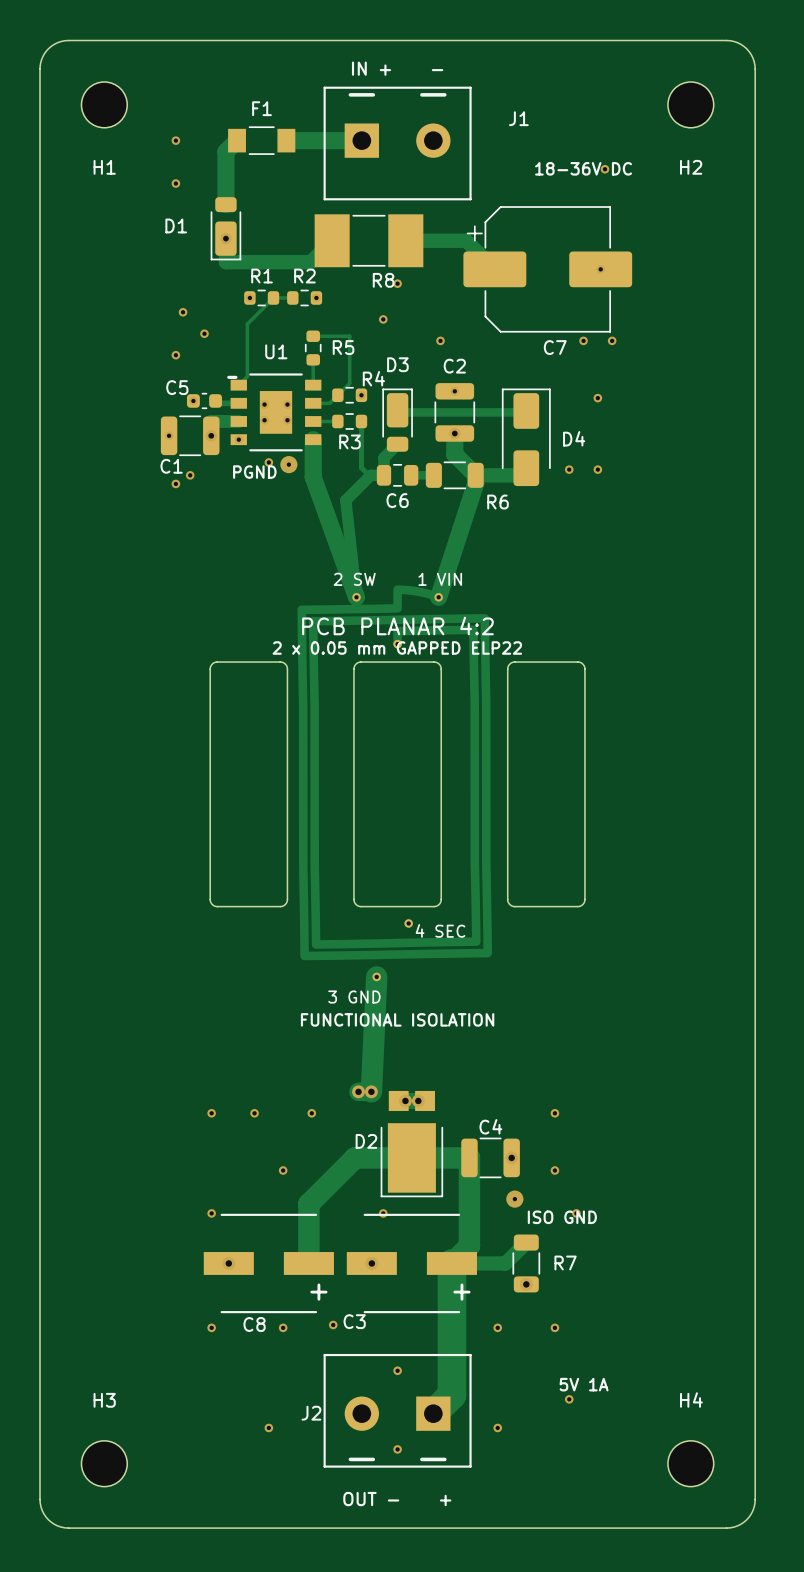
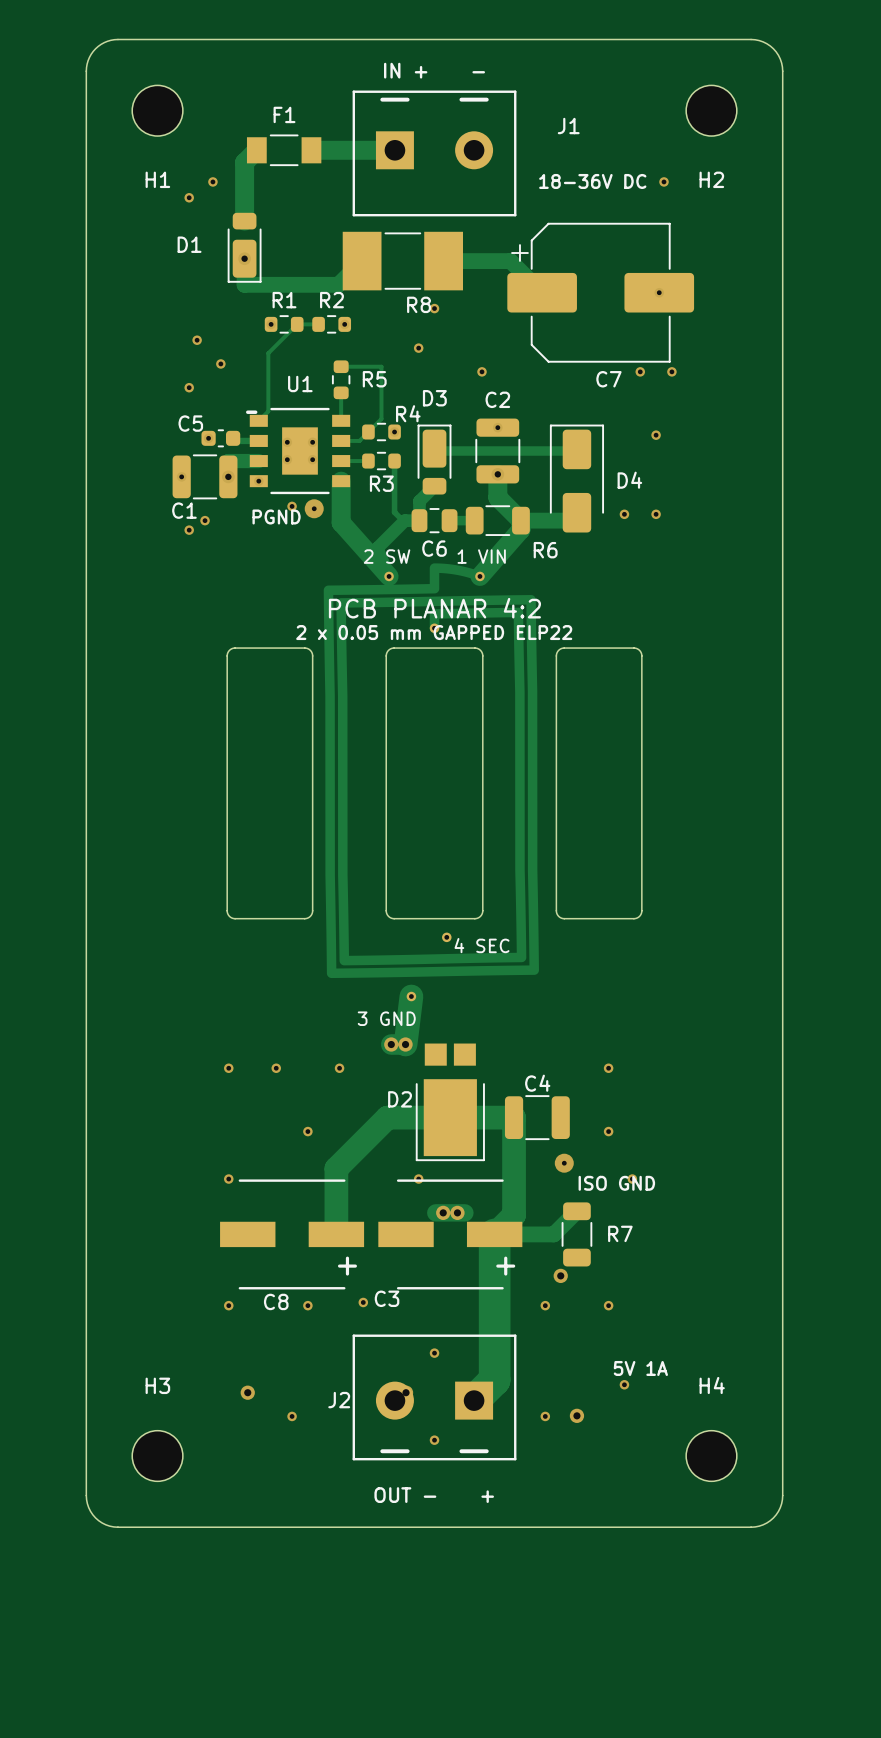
board edge: (111, 40) (59, 42) (50, 46) (44, 53) (39, 69) (39, 1499) (42, 1510) (48, 1519) (57, 1525) (68, 1528) (726, 1528) (740, 1524) (753, 1510) (755, 1499) (755, 69) (749, 51) (737, 42) (726, 40) (683, 40) -> (117, 39) (107, 41) (95, 48) (88, 60) (86, 71) (86, 1495) (88, 1507) (95, 1517) (105, 1524) (117, 1527) (751, 1527) (766, 1522) (773, 1517) (780, 1507) (782, 1495) (782, 71) (780, 59) (773, 48) (763, 41) (751, 39)
H1 position: (104, 104) -> (157, 110)
H2 position: (690, 104) -> (711, 110)
via position: (175, 140) -> (212, 181)
text position: 18-36V DC (583, 168) -> 18-36V DC (592, 181)
track: (313, 477) (356, 597) (345, 500) -> (341, 522) (389, 576) (377, 548)
track: (475, 483) (438, 597) -> (520, 529) (479, 576)
text position: PCB PLANAR 4:2 (397, 626) -> PCB PLANAR 4:2 (434, 608)
text position: 2 x 0.05 mm GAPPED ELP22 (397, 647) -> 2 x 0.05 mm GAPPED ELP22 (434, 632)
board edge: (210, 669) (212, 664) (217, 662) (281, 662) (285, 664) (287, 669) -> (227, 735) (227, 655) (229, 650) (235, 648) (304, 648) (310, 650) (312, 655) (312, 735)
board edge: (353, 669) (356, 664) (361, 662) (434, 662) (439, 664) (441, 669) -> (386, 735) (386, 655) (388, 650) (394, 648) (474, 648) (480, 650) (482, 655) (482, 735)
board edge: (507, 669) (509, 664) (514, 662) (578, 662) (583, 664) (584, 669) -> (556, 735) (556, 655) (558, 650) (564, 648) (633, 648) (639, 650) (641, 655) (641, 735)
part position: (394, 783) -> (431, 782)
board edge: (210, 827) (210, 900) (212, 904) (217, 906) (280, 906) (285, 904) (287, 899) (287, 827) -> (227, 910) (229, 916) (235, 918) (305, 918) (310, 916) (312, 910)
board edge: (353, 827) (354, 900) (356, 905) (361, 906) (434, 906) (439, 904) (441, 899) (441, 827) -> (386, 910) (388, 916) (394, 918) (475, 918) (480, 916) (482, 910)
board edge: (507, 827) (507, 900) (509, 904) (514, 906) (577, 906) (582, 904) (584, 899) (584, 827) -> (556, 910) (558, 916) (564, 918) (634, 918) (639, 916) (641, 910)
track: none -> (411, 996) (405, 1044) (391, 1044)
via: none -> (391, 1044)
via: none -> (405, 1044)
via: none -> (228, 1068)
via: none -> (276, 1068)
via: none -> (339, 1068)
via: none -> (608, 1068)
track: (376, 976) (371, 1091) (358, 1091) -> none
text: FUNCTIONAL ISOLATION (397, 1019) -> none
via: none -> (307, 1131)
via: none -> (608, 1131)
via: none -> (564, 1163)
via: none -> (228, 1179)
via: none -> (418, 1179)
via: none -> (632, 1179)
via: (358, 1091) -> none
via: (371, 1091) -> none
via: (211, 1113) -> none
via: (254, 1113) -> none
via: (311, 1113) -> none
via: (554, 1113) -> none
D2 position: (411, 1144) -> (450, 1102)
C4 position: (490, 1157) -> (537, 1117)
via position: (283, 1170) -> (307, 1305)
via position: (554, 1170) -> (608, 1305)
via: none -> (363, 1302)
via: none -> (545, 1305)
via: (514, 1199) -> none
via position: (211, 1213) -> (228, 1305)
via position: (383, 1213) -> (434, 1353)
via: (576, 1213) -> none
text position: ISO GND (562, 1217) -> ISO GND (616, 1183)
track: (526, 1242) (505, 1263) (451, 1263) -> (576, 1211) (553, 1234) (494, 1234)
via: none -> (624, 1384)
C8 position: (268, 1263) -> (292, 1234)
track: (308, 1263) (308, 1204) (355, 1157) (469, 1157) (469, 1245) (451, 1263) -> (336, 1234) (336, 1168) (387, 1117) (514, 1117) (514, 1215) (494, 1234)
C3 position: (411, 1263) -> (450, 1234)
track: (451, 1263) (451, 1395) (433, 1413) -> (494, 1234) (494, 1380) (474, 1400)
R7 position: (526, 1263) -> (576, 1234)
via: none -> (292, 1416)
via: none -> (545, 1416)
via: none -> (434, 1440)
via: (333, 1324) -> none
via: (211, 1327) -> none
via: (283, 1327) -> none
via: (497, 1327) -> none
via: (554, 1327) -> none
via: (397, 1370) -> none
text position: 5V 1A (584, 1384) -> 5V 1A (640, 1368)
via: (569, 1399) -> none
J2 position: (397, 1410) -> (434, 1397)
via: (268, 1427) -> none
via: (497, 1427) -> none
via: (397, 1449) -> none
H3 position: (104, 1463) -> (157, 1456)
H4 position: (690, 1463) -> (711, 1456)
text position: OUT - + (397, 1499) -> OUT - + (434, 1495)

